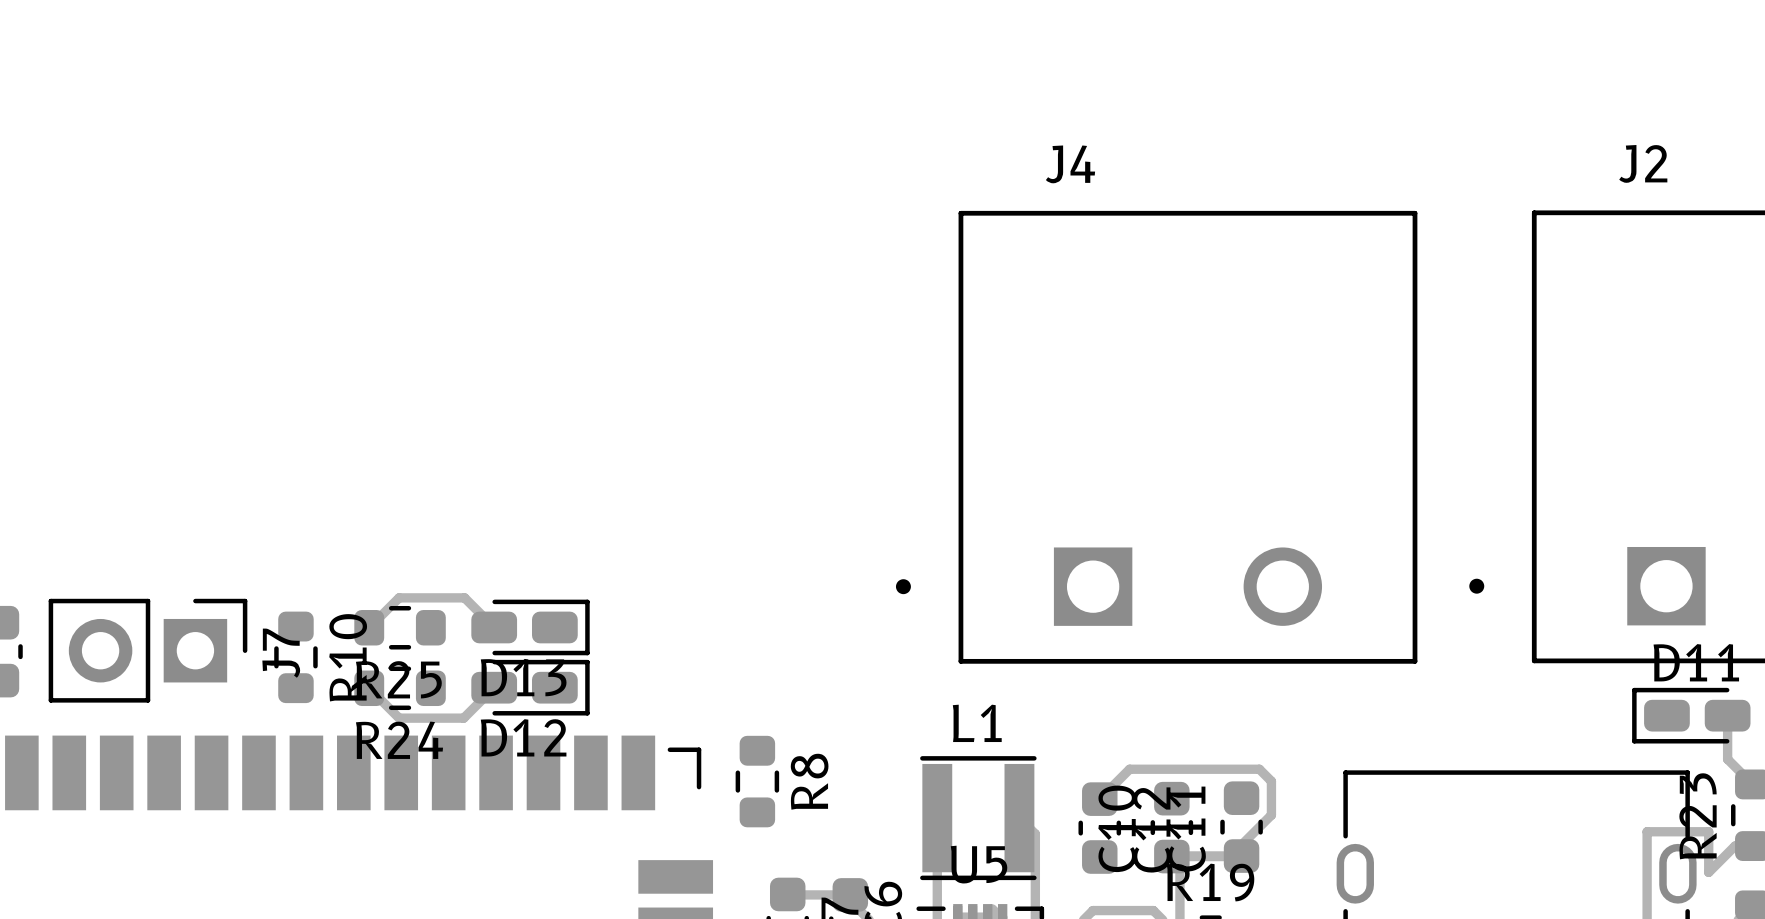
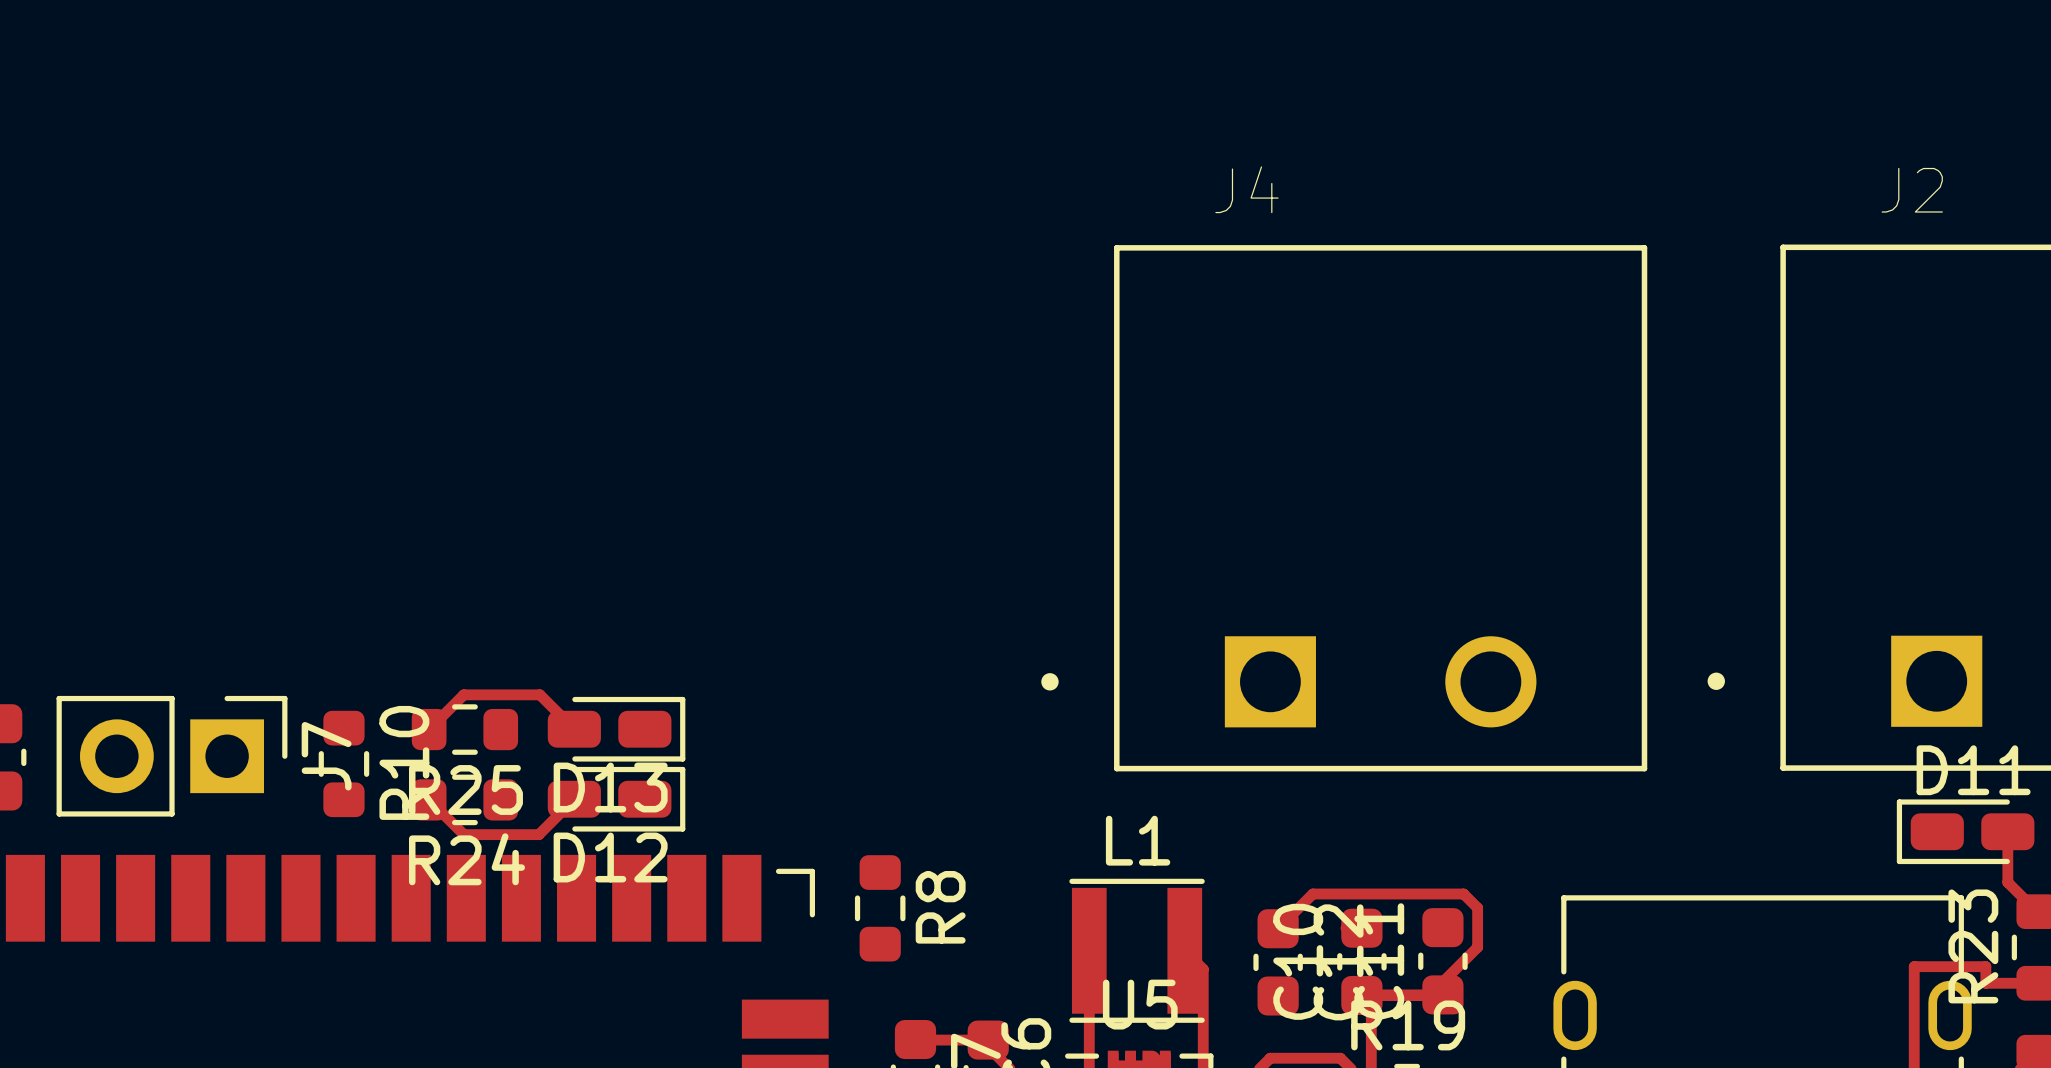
track: (1708, 846) (1708, 872) (1735, 846) -> (1985, 983) (2016, 983)

